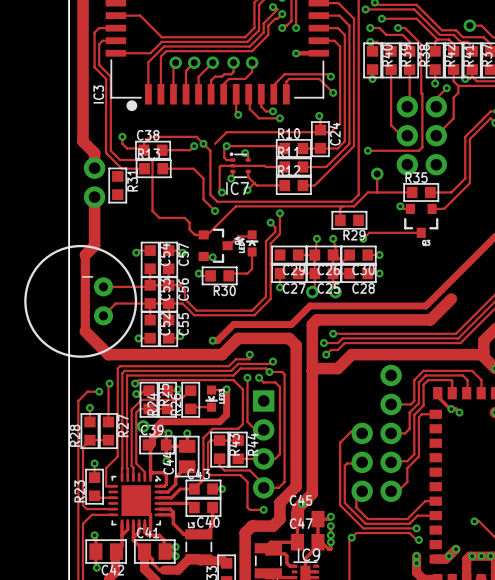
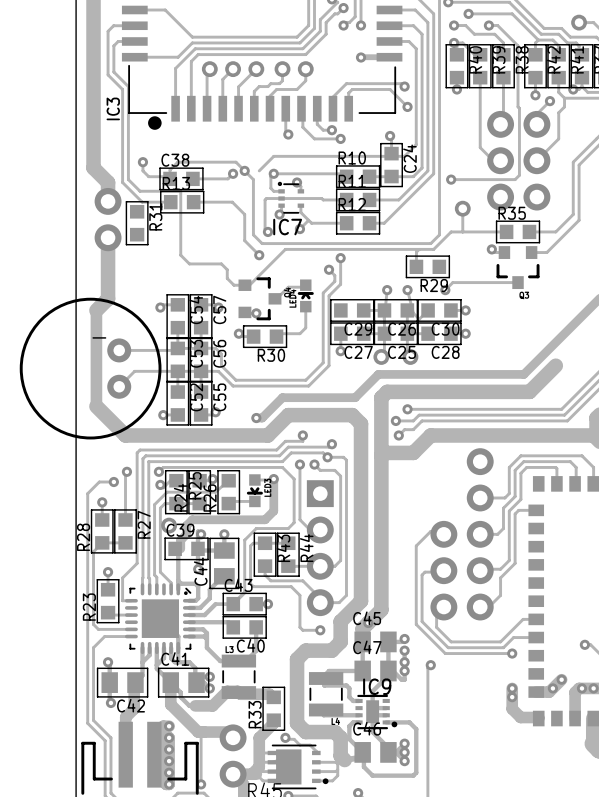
track: (437, 393) (437, 396) (450, 409) (455, 409) (459, 412) -> none
via: (451, 409) -> none
via: (459, 412) -> none
track: (351, 537) (356, 533) (409, 533) (418, 539) -> none
via: (418, 539) -> none

